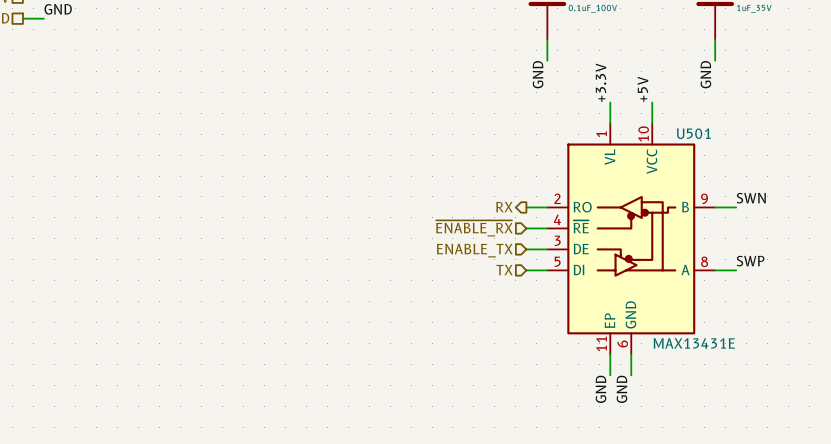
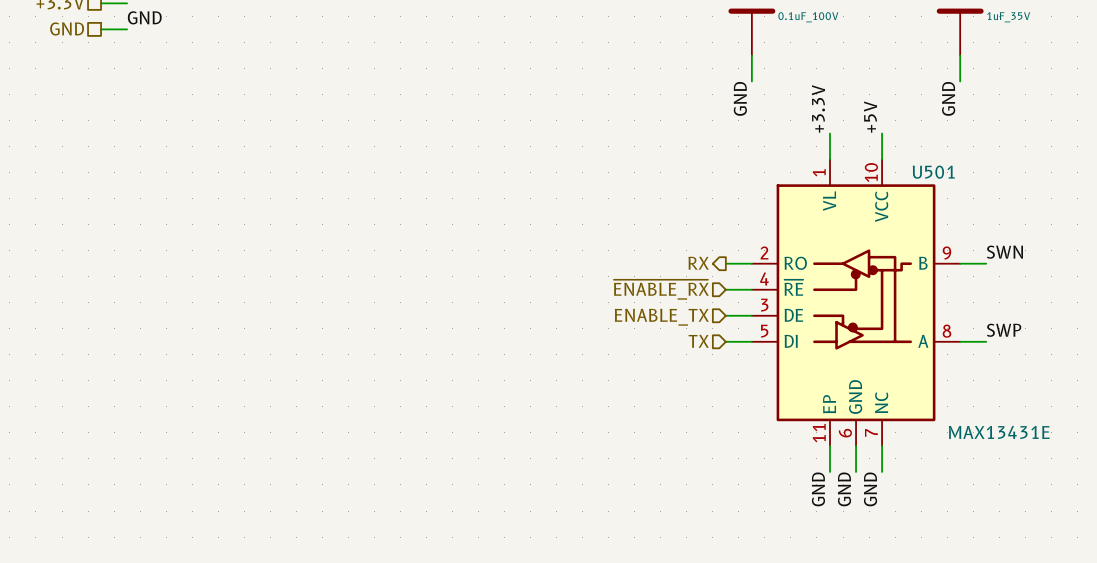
U501 symbol: [547, 123, 716, 355] -> [751, 159, 961, 446]
U501 value position: MAX13431E (694, 343) -> MAX13431E (999, 432)
wire: none -> (882, 445) (882, 471)
label: none -> GND (870, 489)

